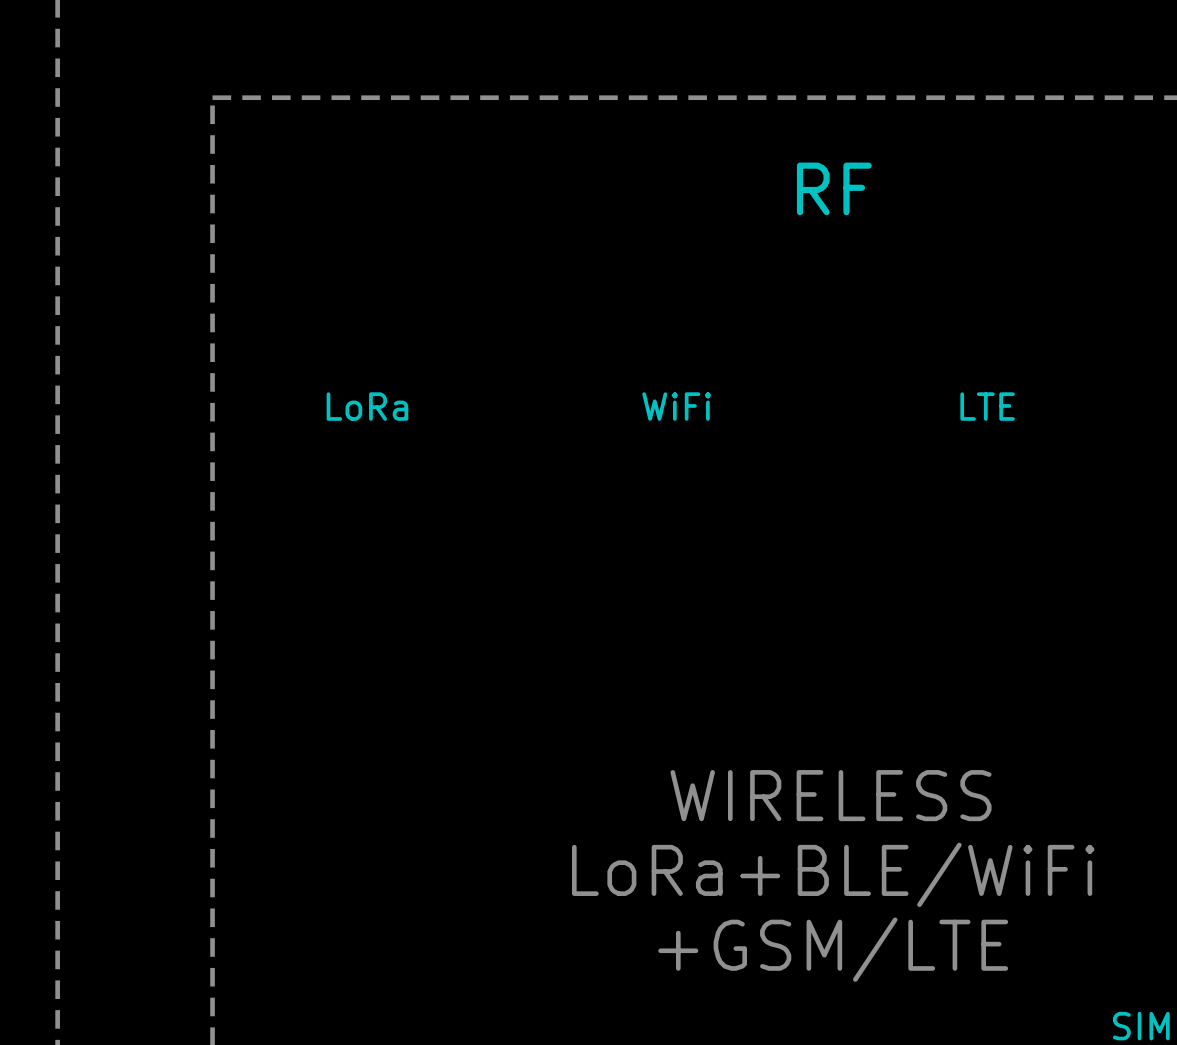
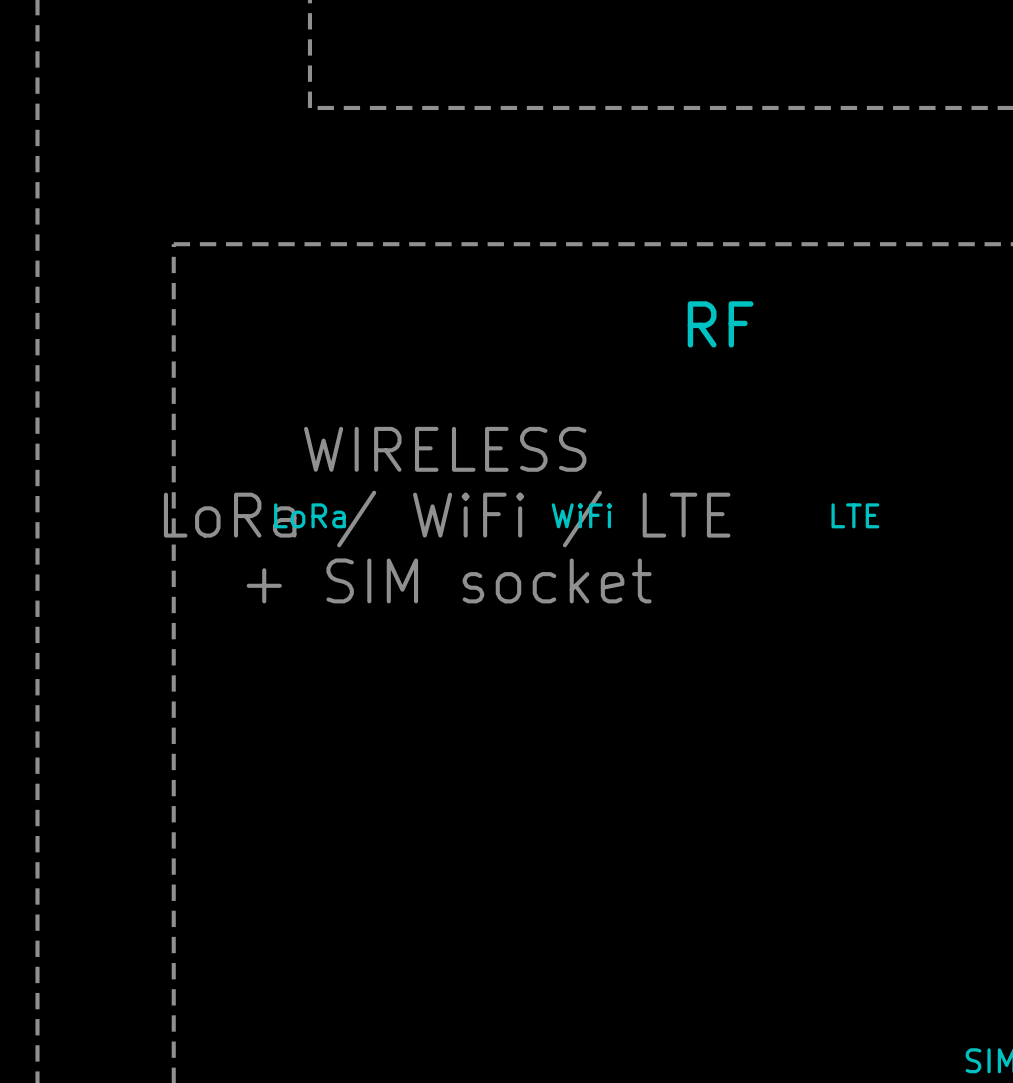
text: none -> LoRa / WiFi / LTE (447, 519)
text: none -> + SIM socket (449, 580)
text position: WIRELESS (830, 795) -> WIRELESS (445, 449)
text: LoRa+BLE/WiFi (833, 874) -> none
text: +GSM/LTE (833, 949) -> none

